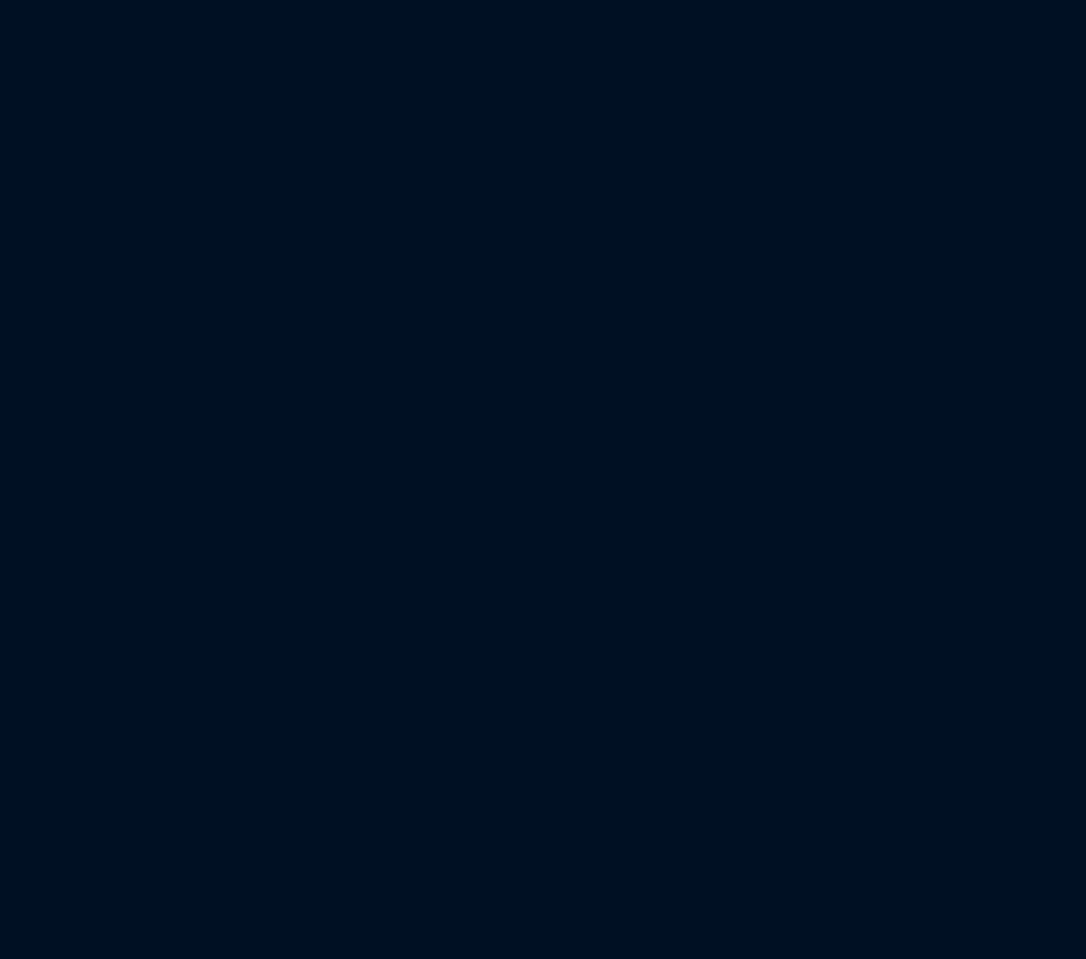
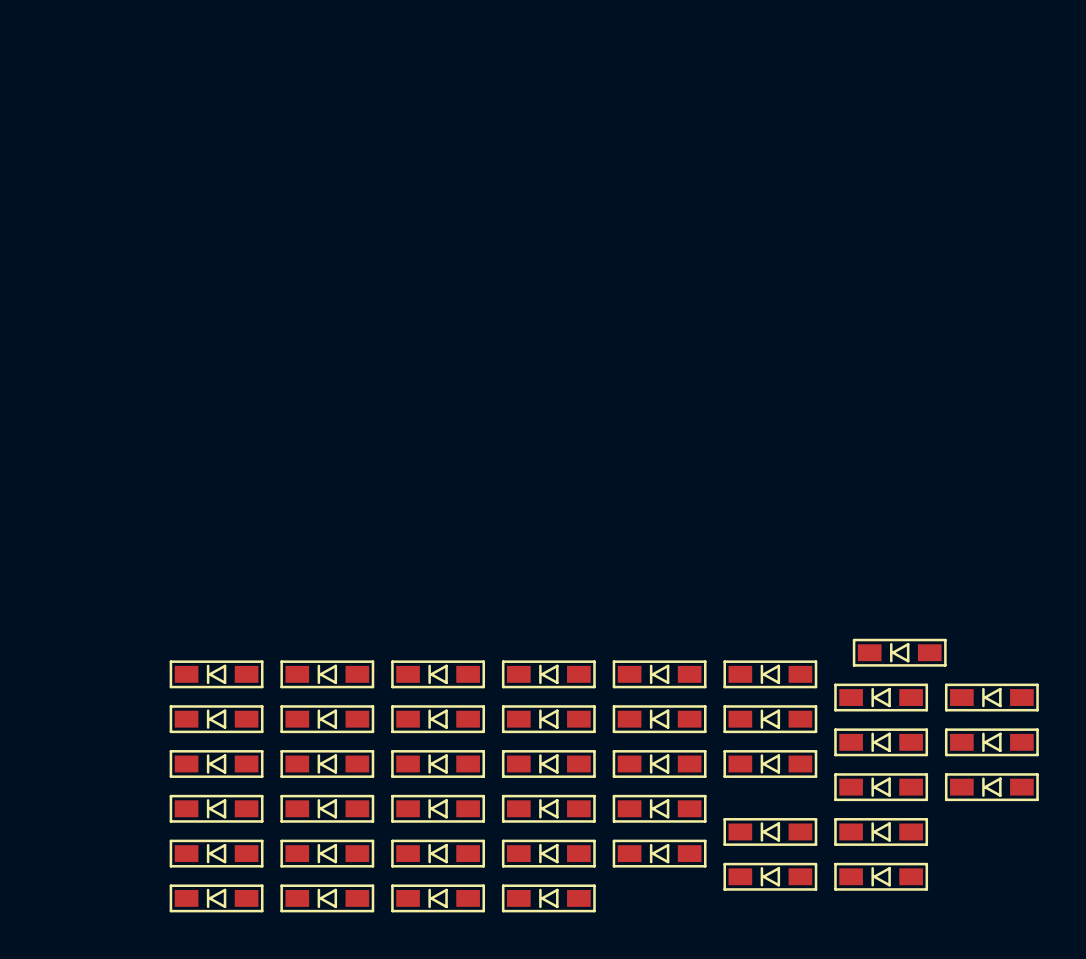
part: none -> (899, 652)
part: none -> (216, 674)
part: none -> (327, 674)
part: none -> (438, 674)
part: none -> (548, 674)
part: none -> (659, 674)
part: none -> (770, 674)
part: none -> (881, 697)
part: none -> (991, 697)
part: none -> (216, 719)
part: none -> (327, 719)
part: none -> (438, 719)
part: none -> (548, 719)
part: none -> (659, 719)
part: none -> (770, 719)
part: none -> (881, 742)
part: none -> (991, 742)
part: none -> (216, 763)
part: none -> (327, 763)
part: none -> (438, 763)
part: none -> (548, 763)
part: none -> (659, 763)
part: none -> (770, 763)
part: none -> (881, 787)
part: none -> (991, 787)
part: none -> (216, 808)
part: none -> (327, 808)
part: none -> (438, 808)
part: none -> (548, 808)
part: none -> (659, 808)
part: none -> (770, 831)
part: none -> (881, 831)
part: none -> (216, 853)
part: none -> (327, 853)
part: none -> (438, 853)
part: none -> (548, 853)
part: none -> (659, 853)
part: none -> (770, 876)
part: none -> (881, 876)
part: none -> (216, 898)
part: none -> (327, 898)
part: none -> (438, 898)
part: none -> (548, 898)

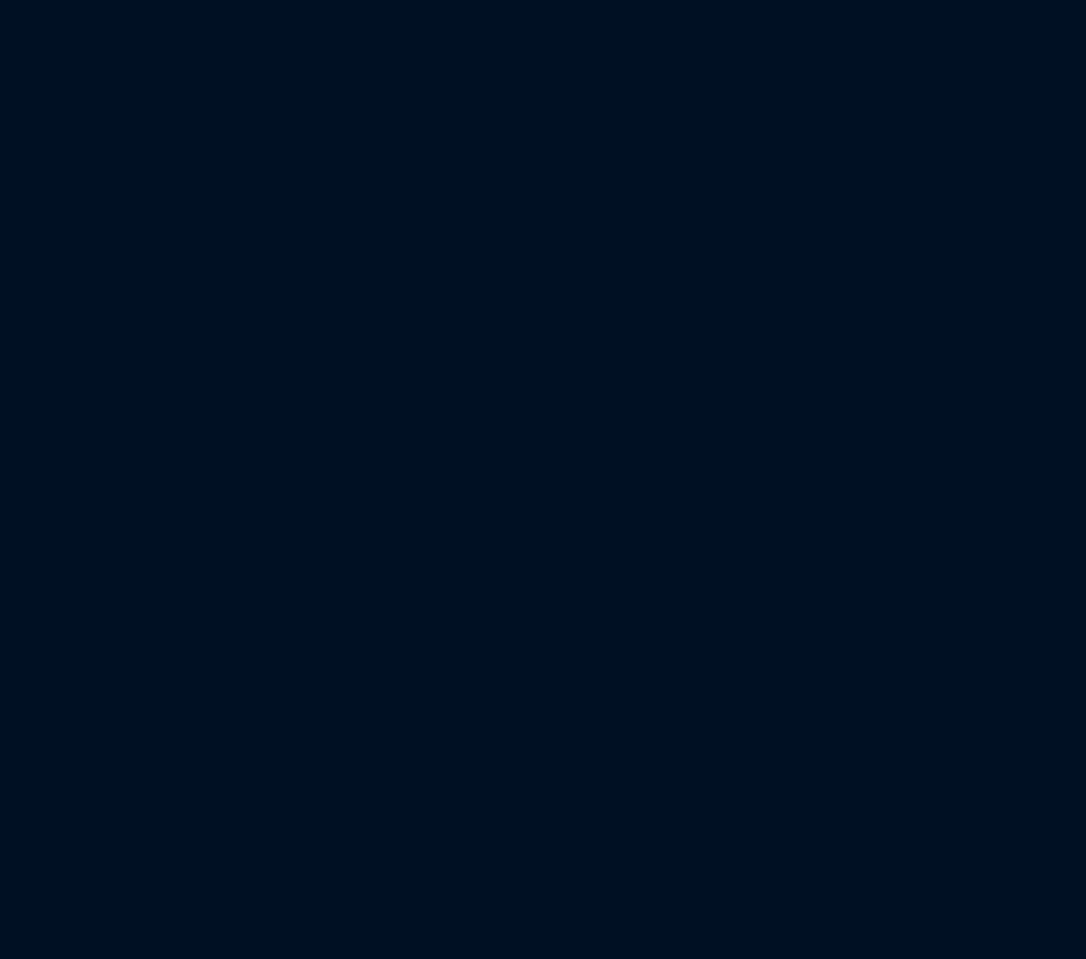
part: (899, 652) -> none
part: (216, 674) -> none
part: (327, 674) -> none
part: (438, 674) -> none
part: (548, 674) -> none
part: (659, 674) -> none
part: (770, 674) -> none
part: (881, 697) -> none
part: (991, 697) -> none
part: (216, 719) -> none
part: (327, 719) -> none
part: (438, 719) -> none
part: (548, 719) -> none
part: (659, 719) -> none
part: (770, 719) -> none
part: (881, 742) -> none
part: (991, 742) -> none
part: (216, 763) -> none
part: (327, 763) -> none
part: (438, 763) -> none
part: (548, 763) -> none
part: (659, 763) -> none
part: (770, 763) -> none
part: (881, 787) -> none
part: (991, 787) -> none
part: (216, 808) -> none
part: (327, 808) -> none
part: (438, 808) -> none
part: (548, 808) -> none
part: (659, 808) -> none
part: (770, 831) -> none
part: (881, 831) -> none
part: (216, 853) -> none
part: (327, 853) -> none
part: (438, 853) -> none
part: (548, 853) -> none
part: (659, 853) -> none
part: (770, 876) -> none
part: (881, 876) -> none
part: (216, 898) -> none
part: (327, 898) -> none
part: (438, 898) -> none
part: (548, 898) -> none

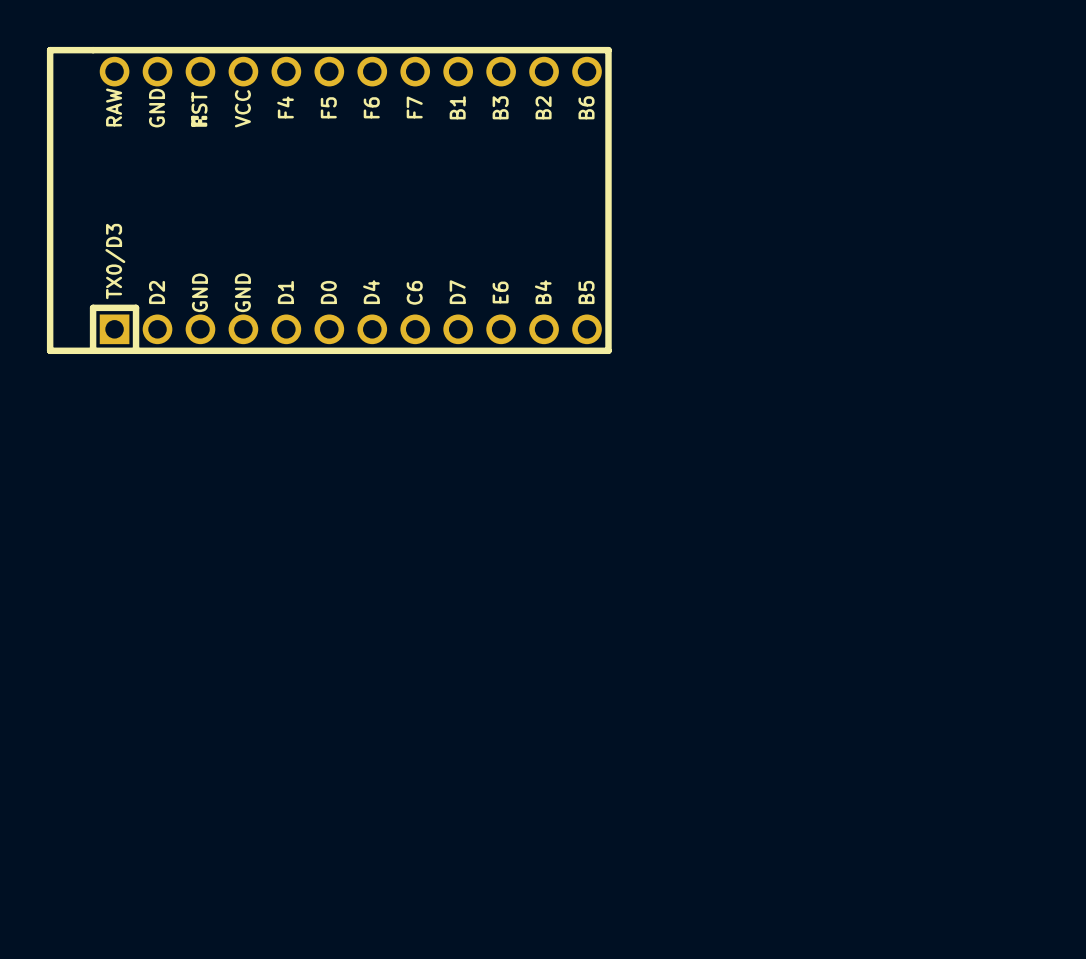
part: none -> (329, 200)

